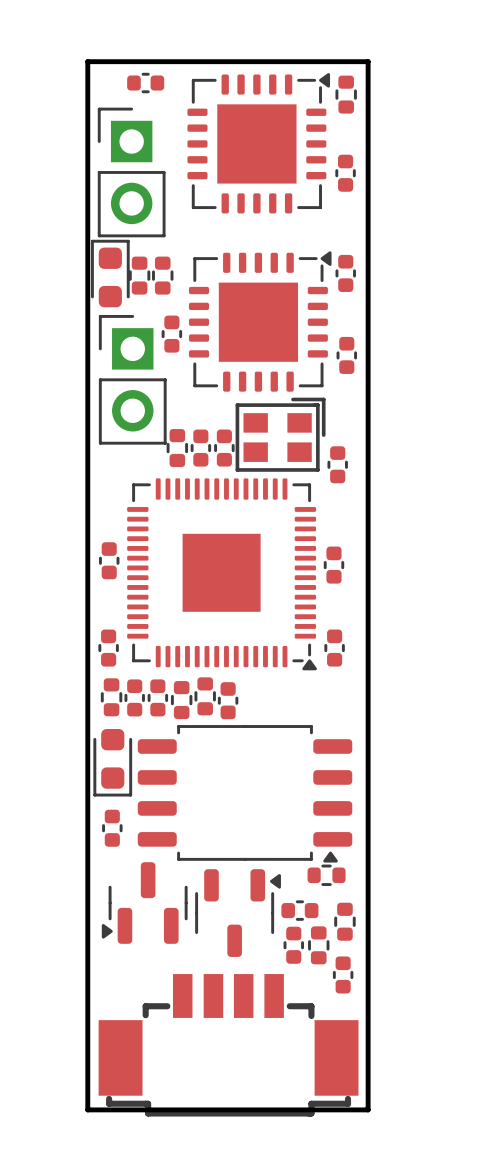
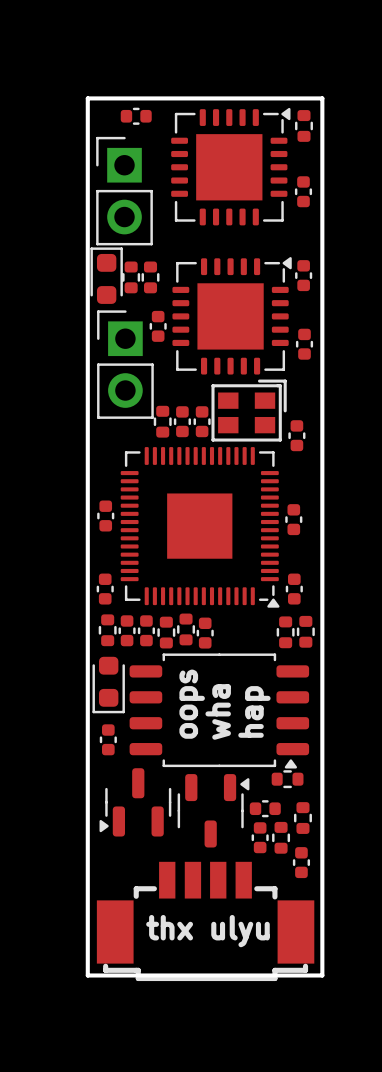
part: none -> (285, 632)
part: none -> (305, 631)
text: none -> oops (192, 704)
text: none -> hap (254, 711)
text: none -> wha (218, 711)
text: none -> thx ulyu (207, 931)

